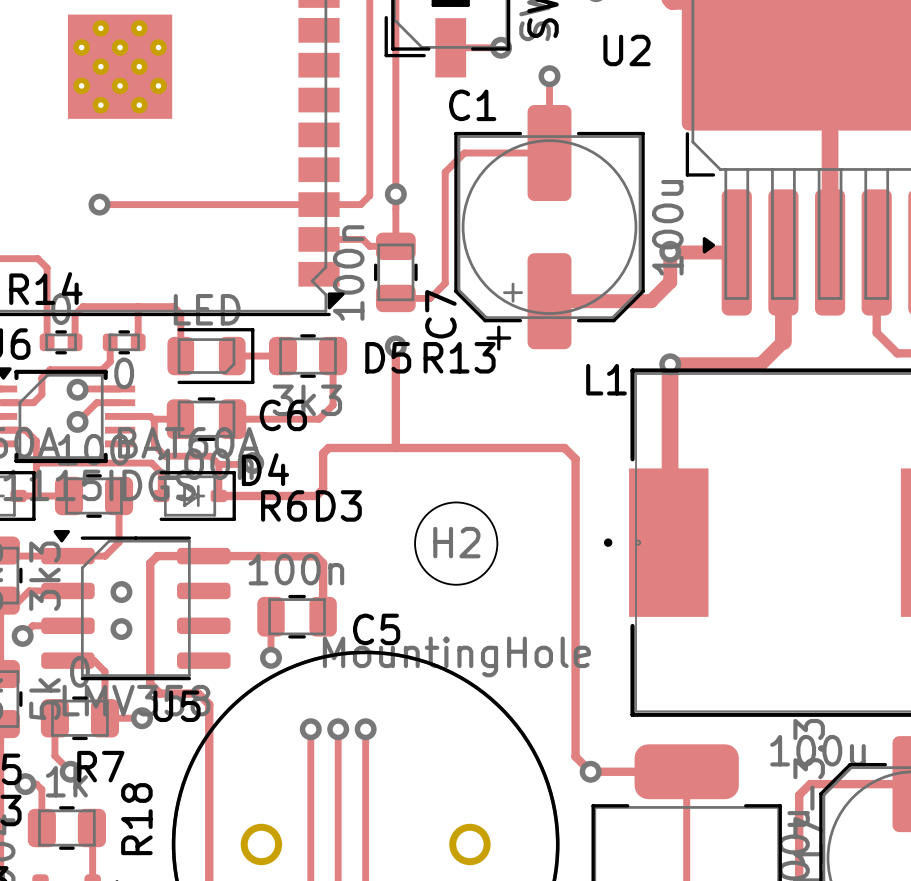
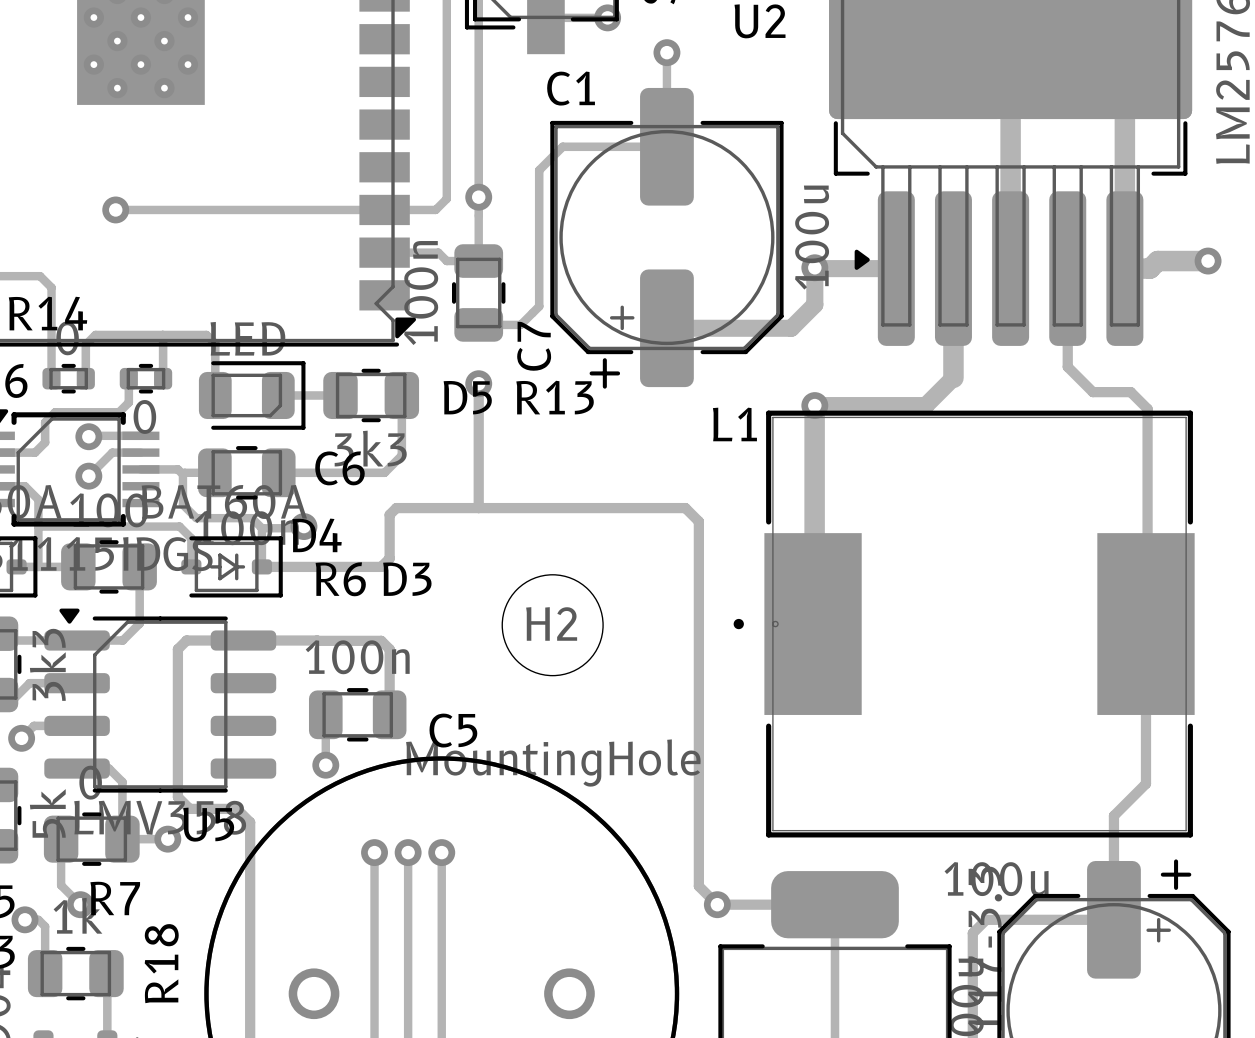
via: (121, 592) -> none
via: (121, 629) -> none

